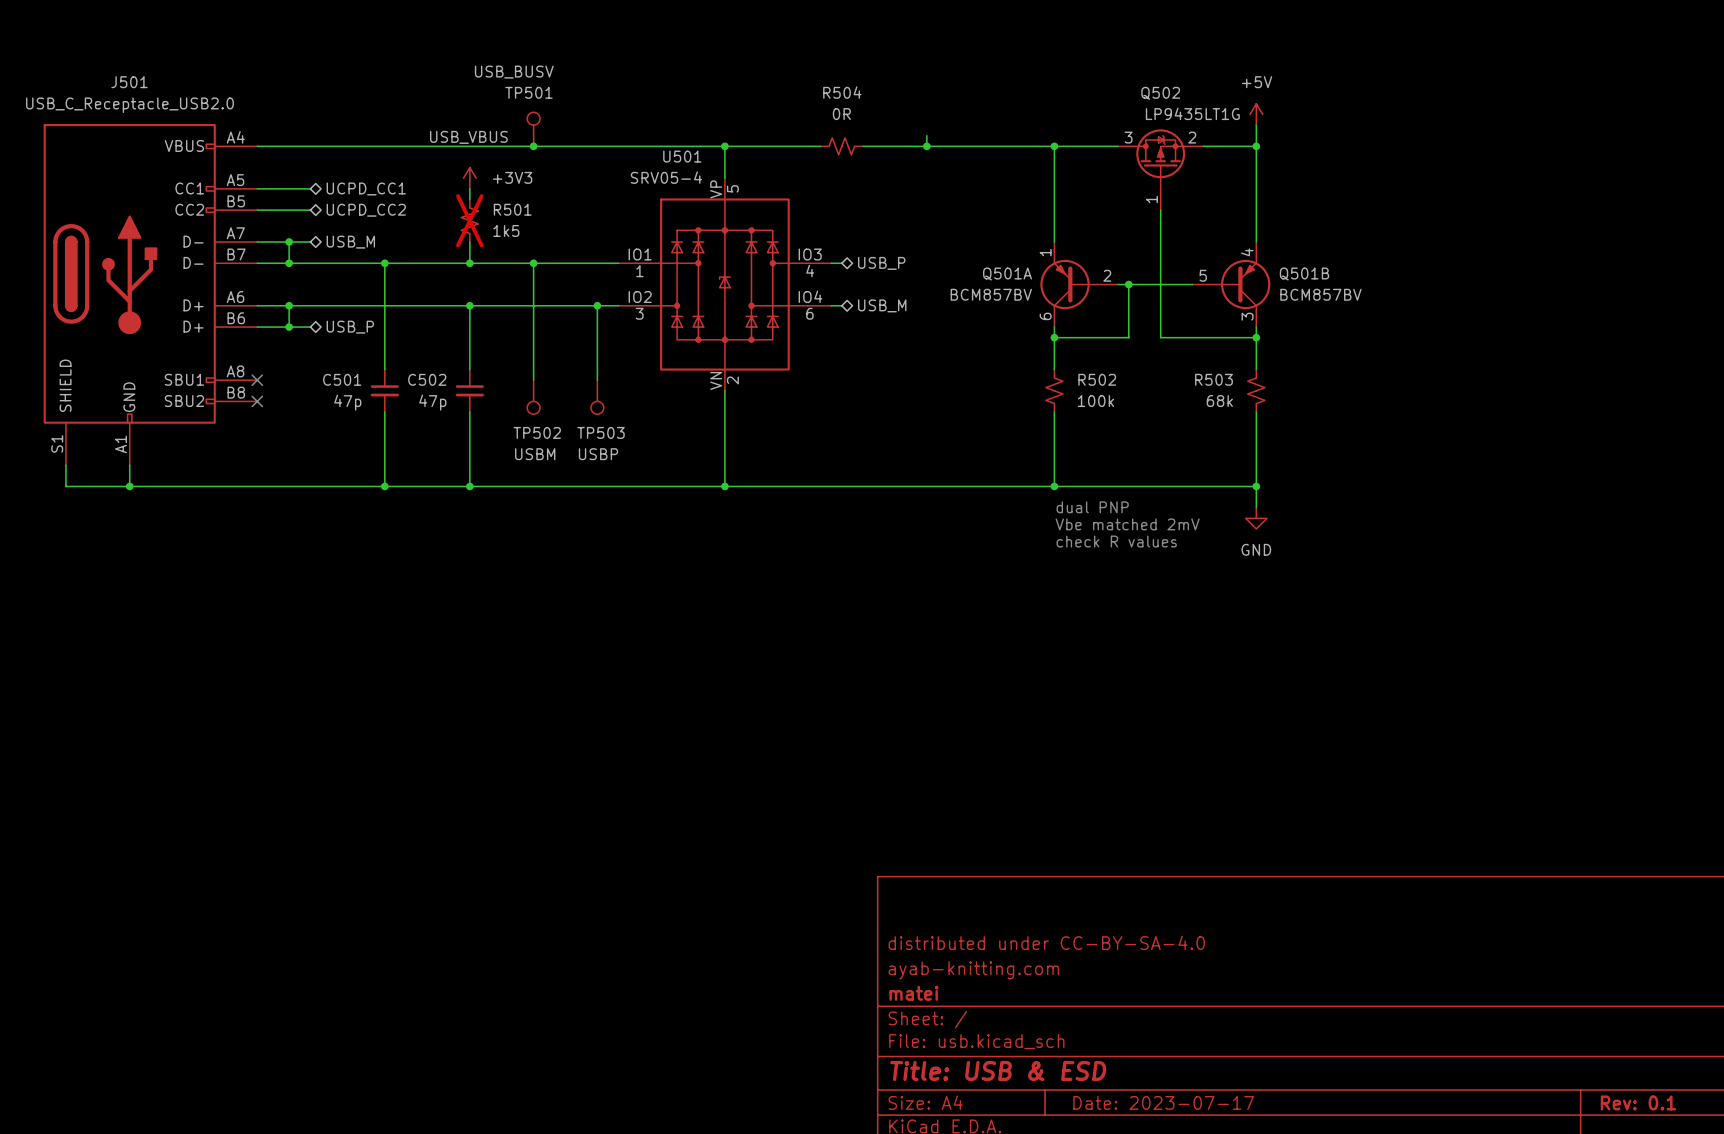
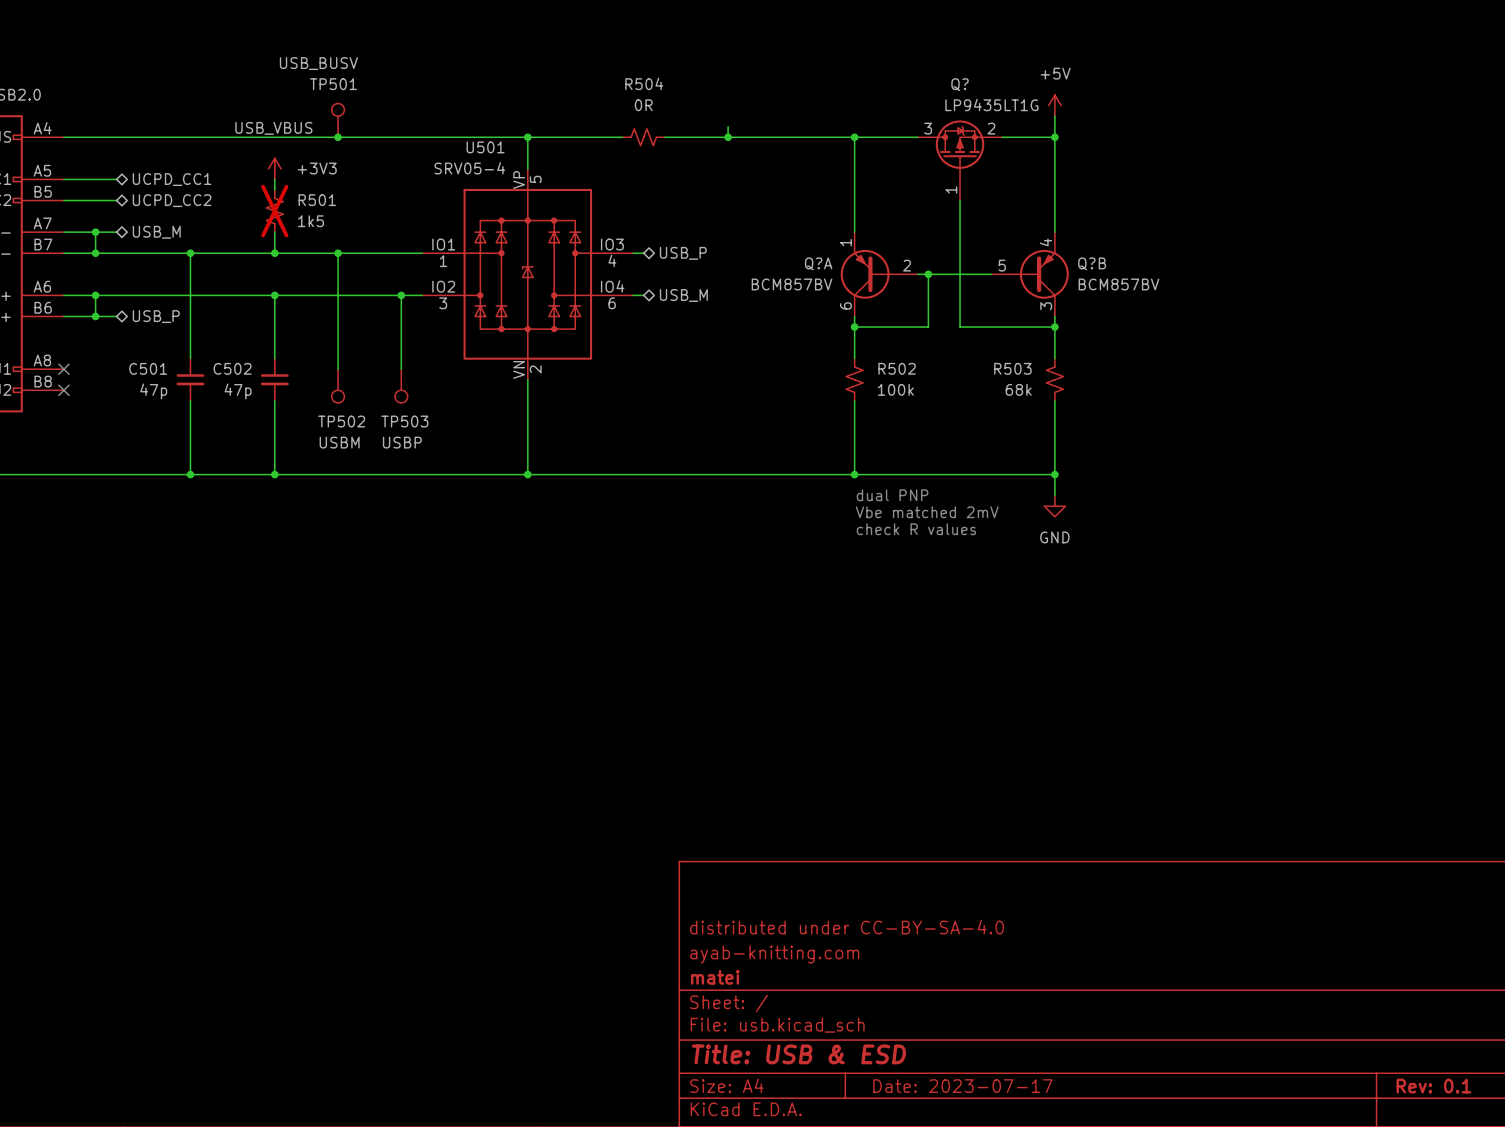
Q502 name: Q502 (1160, 93) -> Q? (960, 84)
Q501A name: Q501A (1007, 274) -> Q?A (818, 263)
Q501B name: Q501B (1304, 274) -> Q?B (1092, 263)

